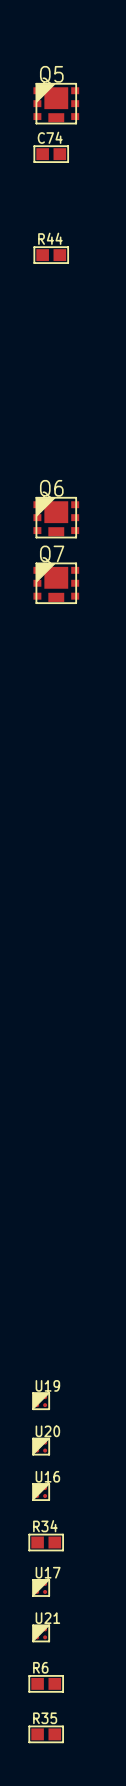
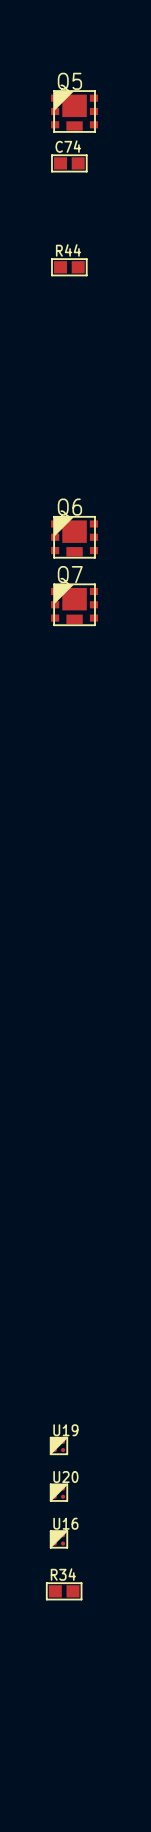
U17: (41, 1587) -> none
U21: (41, 1633) -> none
R6: (46, 1683) -> none
R35: (46, 1734) -> none

